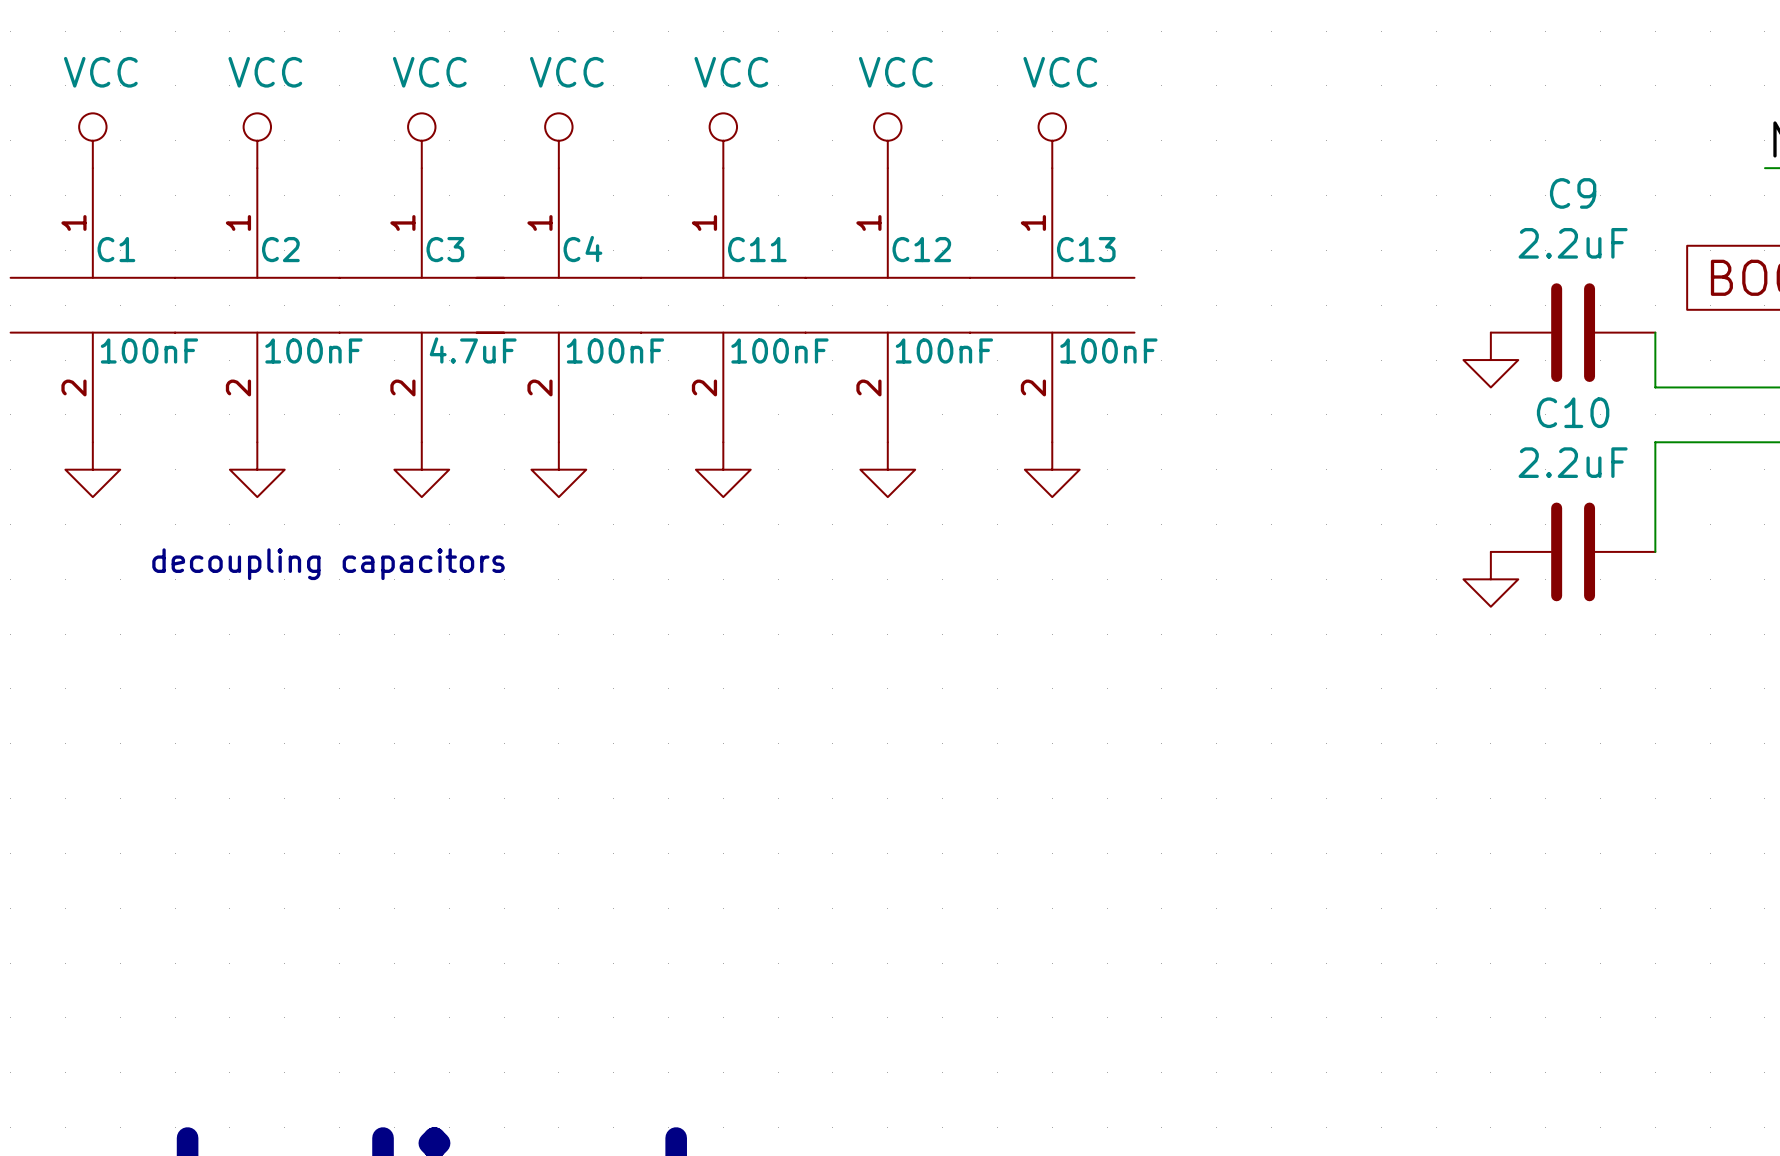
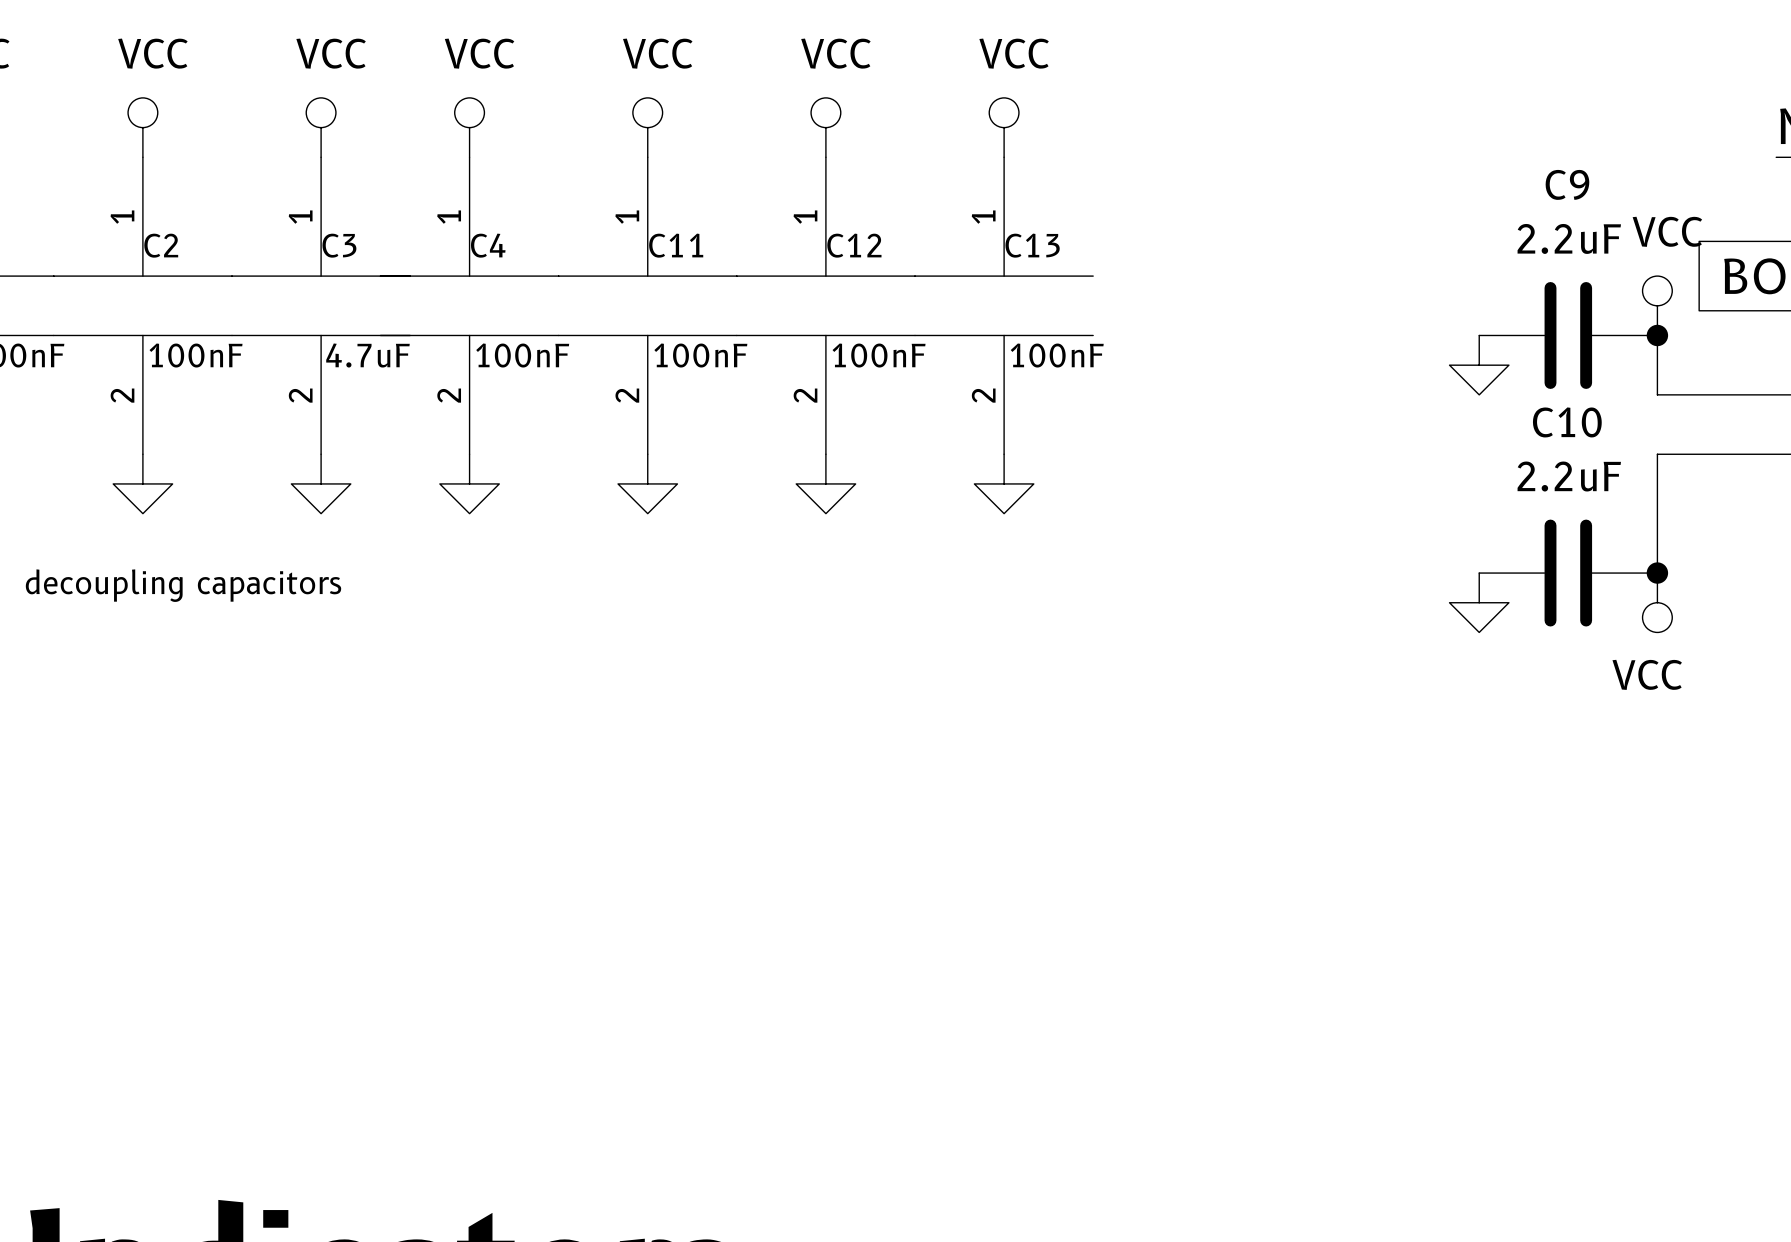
power symbol: none -> VCC (1657, 305)
junction: none -> (1657, 335)
junction: none -> (1657, 573)
power symbol: none -> VCC (1657, 602)

